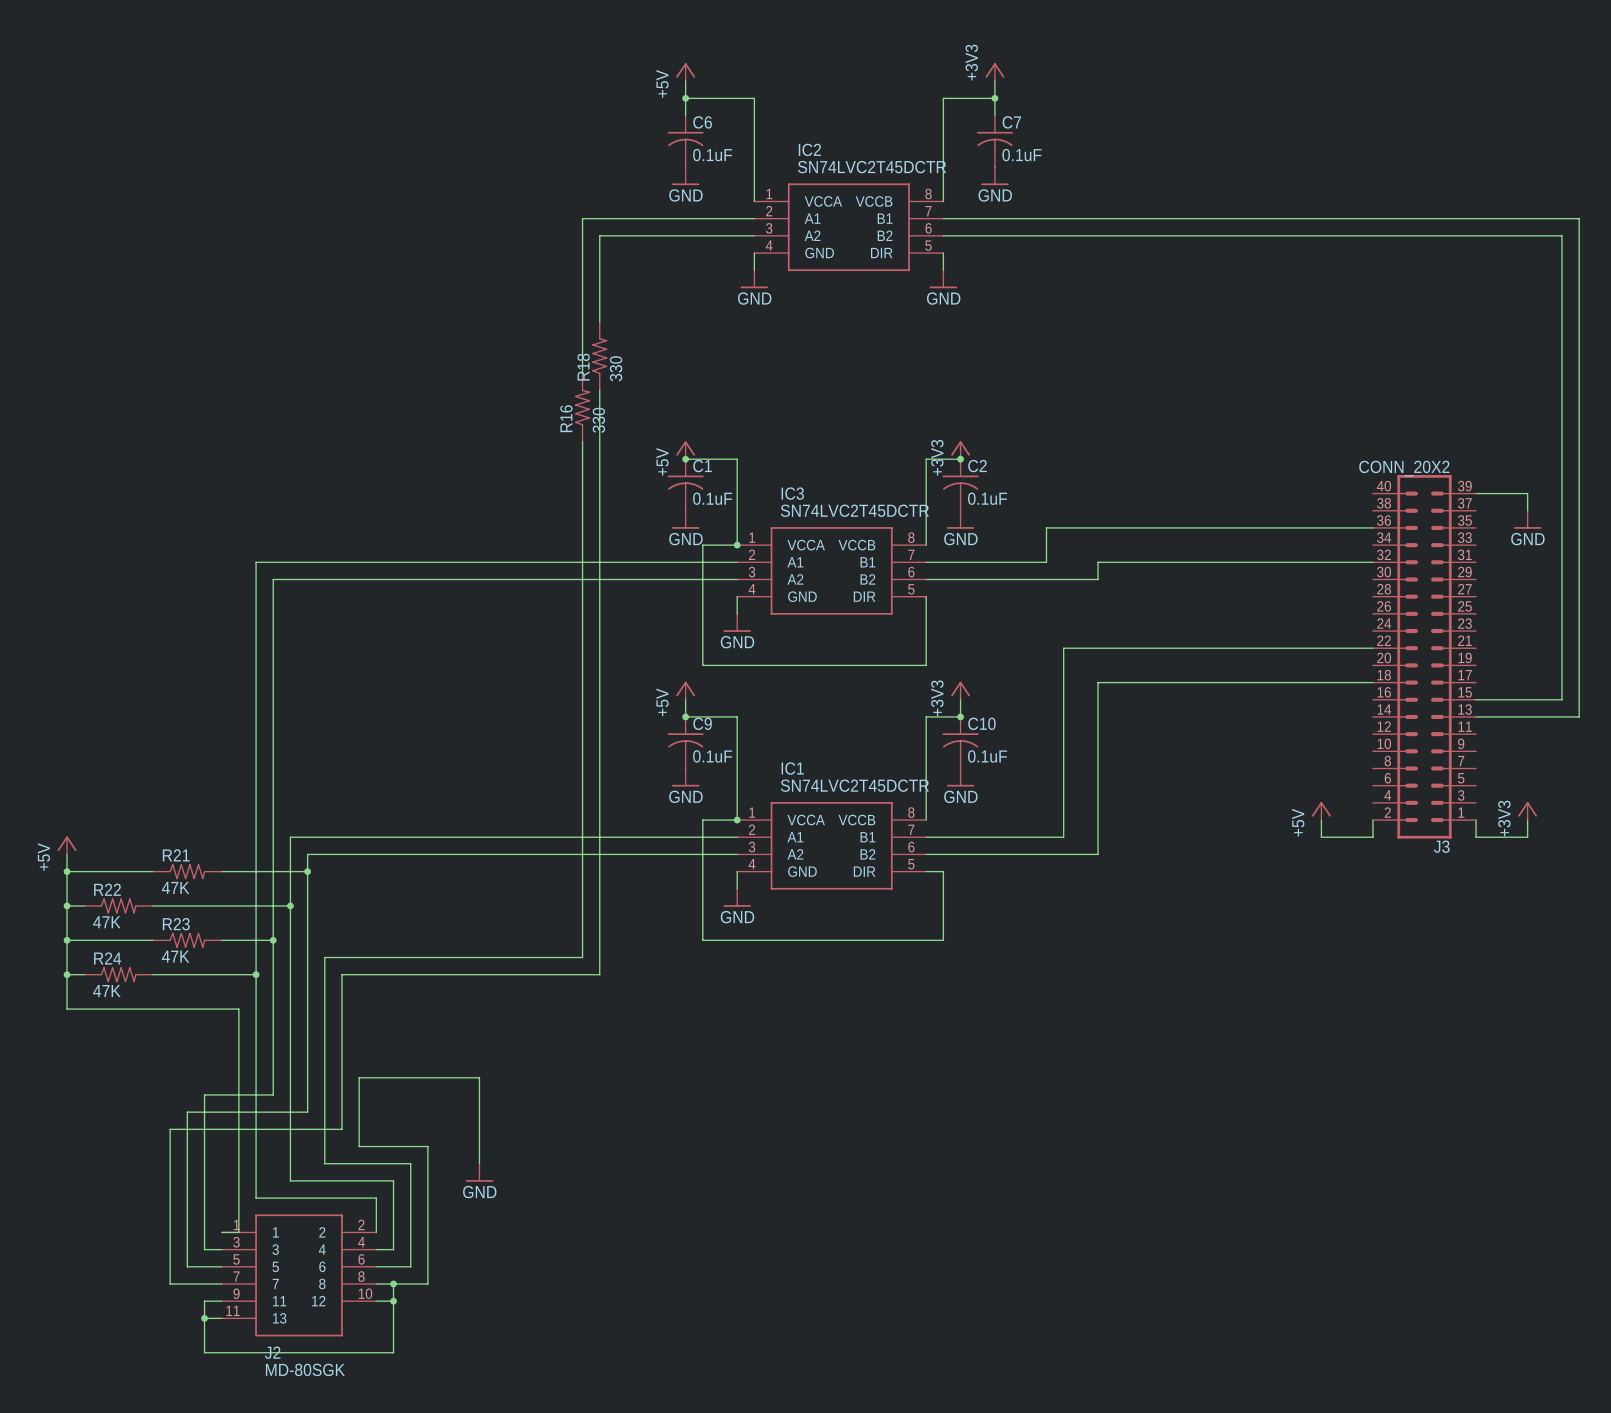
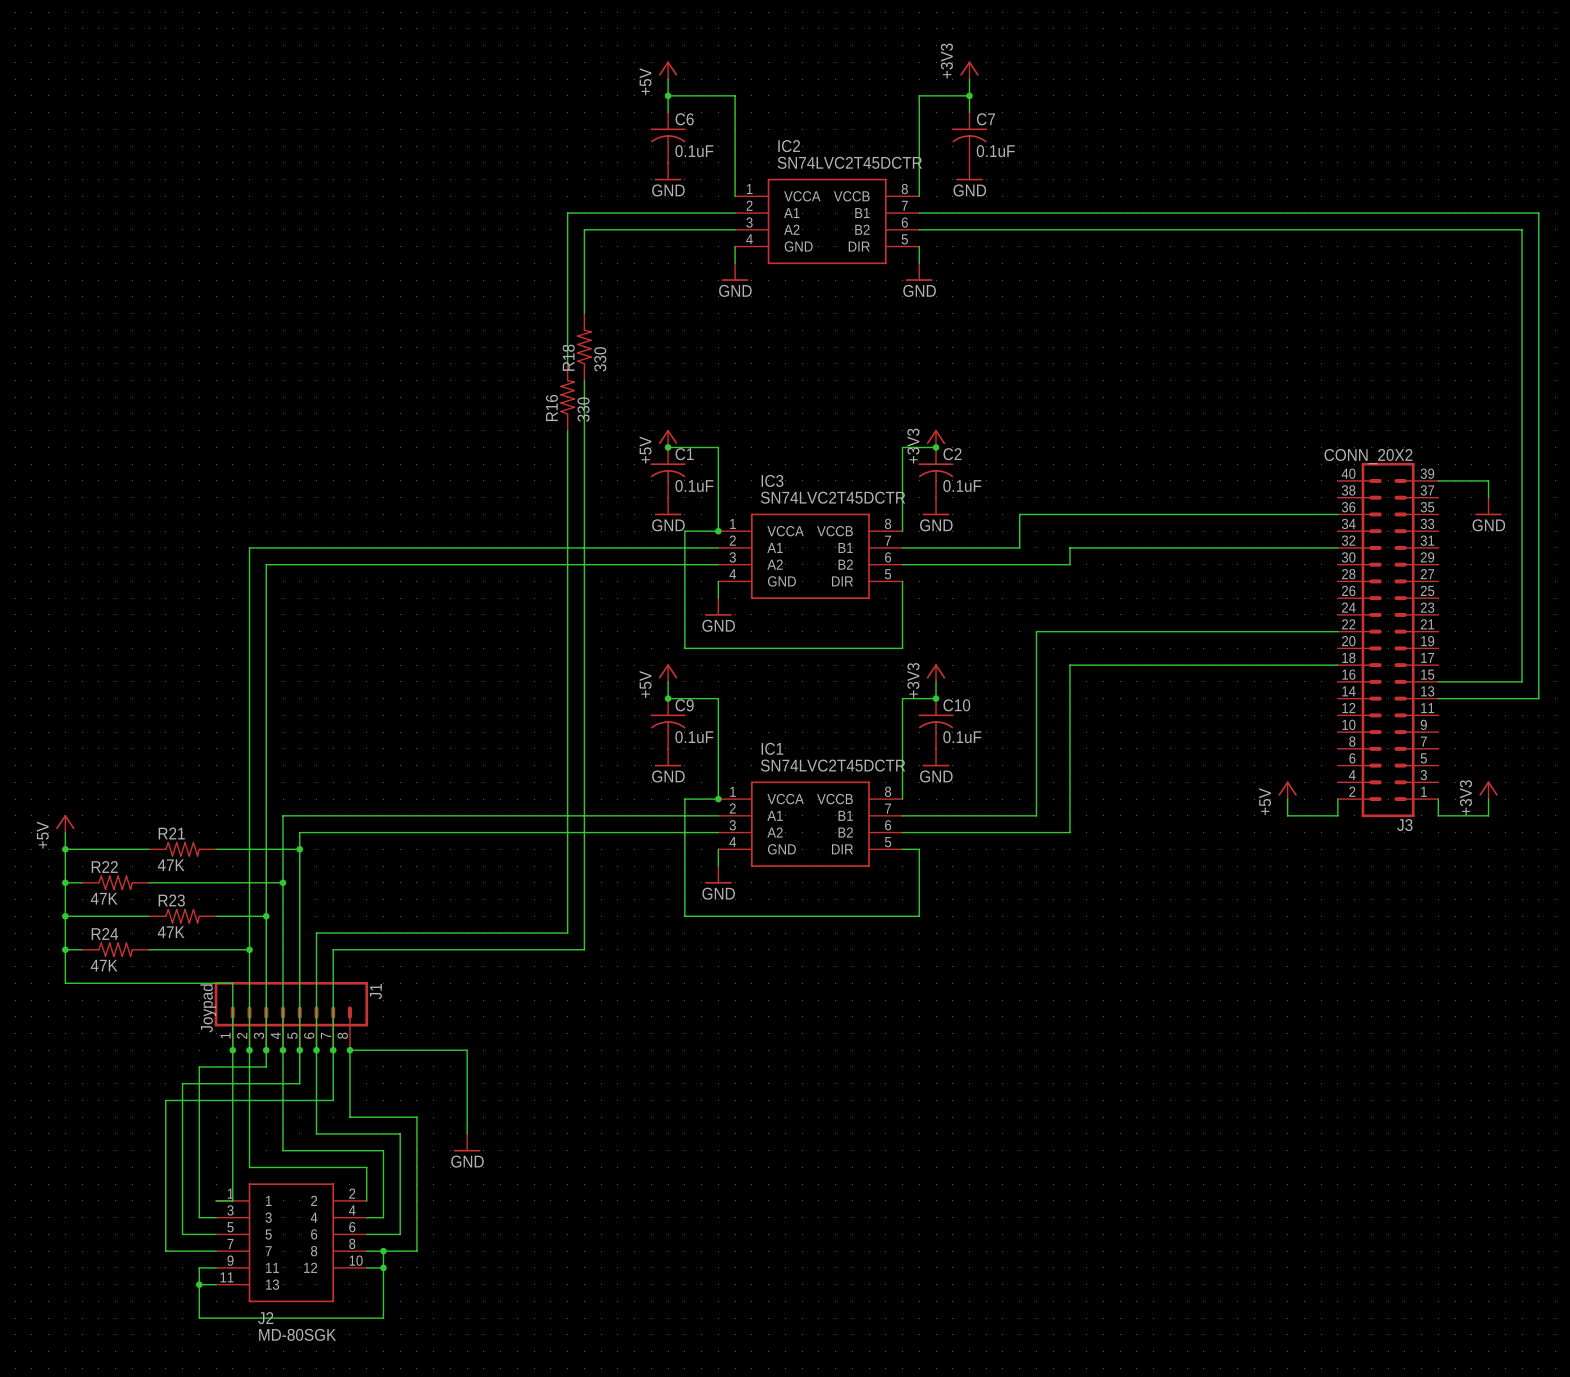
J1: none -> Joypad (291, 1016)
junction: none -> (232, 1050)
junction: none -> (249, 1050)
junction: none -> (266, 1050)
junction: none -> (283, 1050)
junction: none -> (299, 1050)
junction: none -> (316, 1050)
junction: none -> (333, 1050)
junction: none -> (349, 1050)

